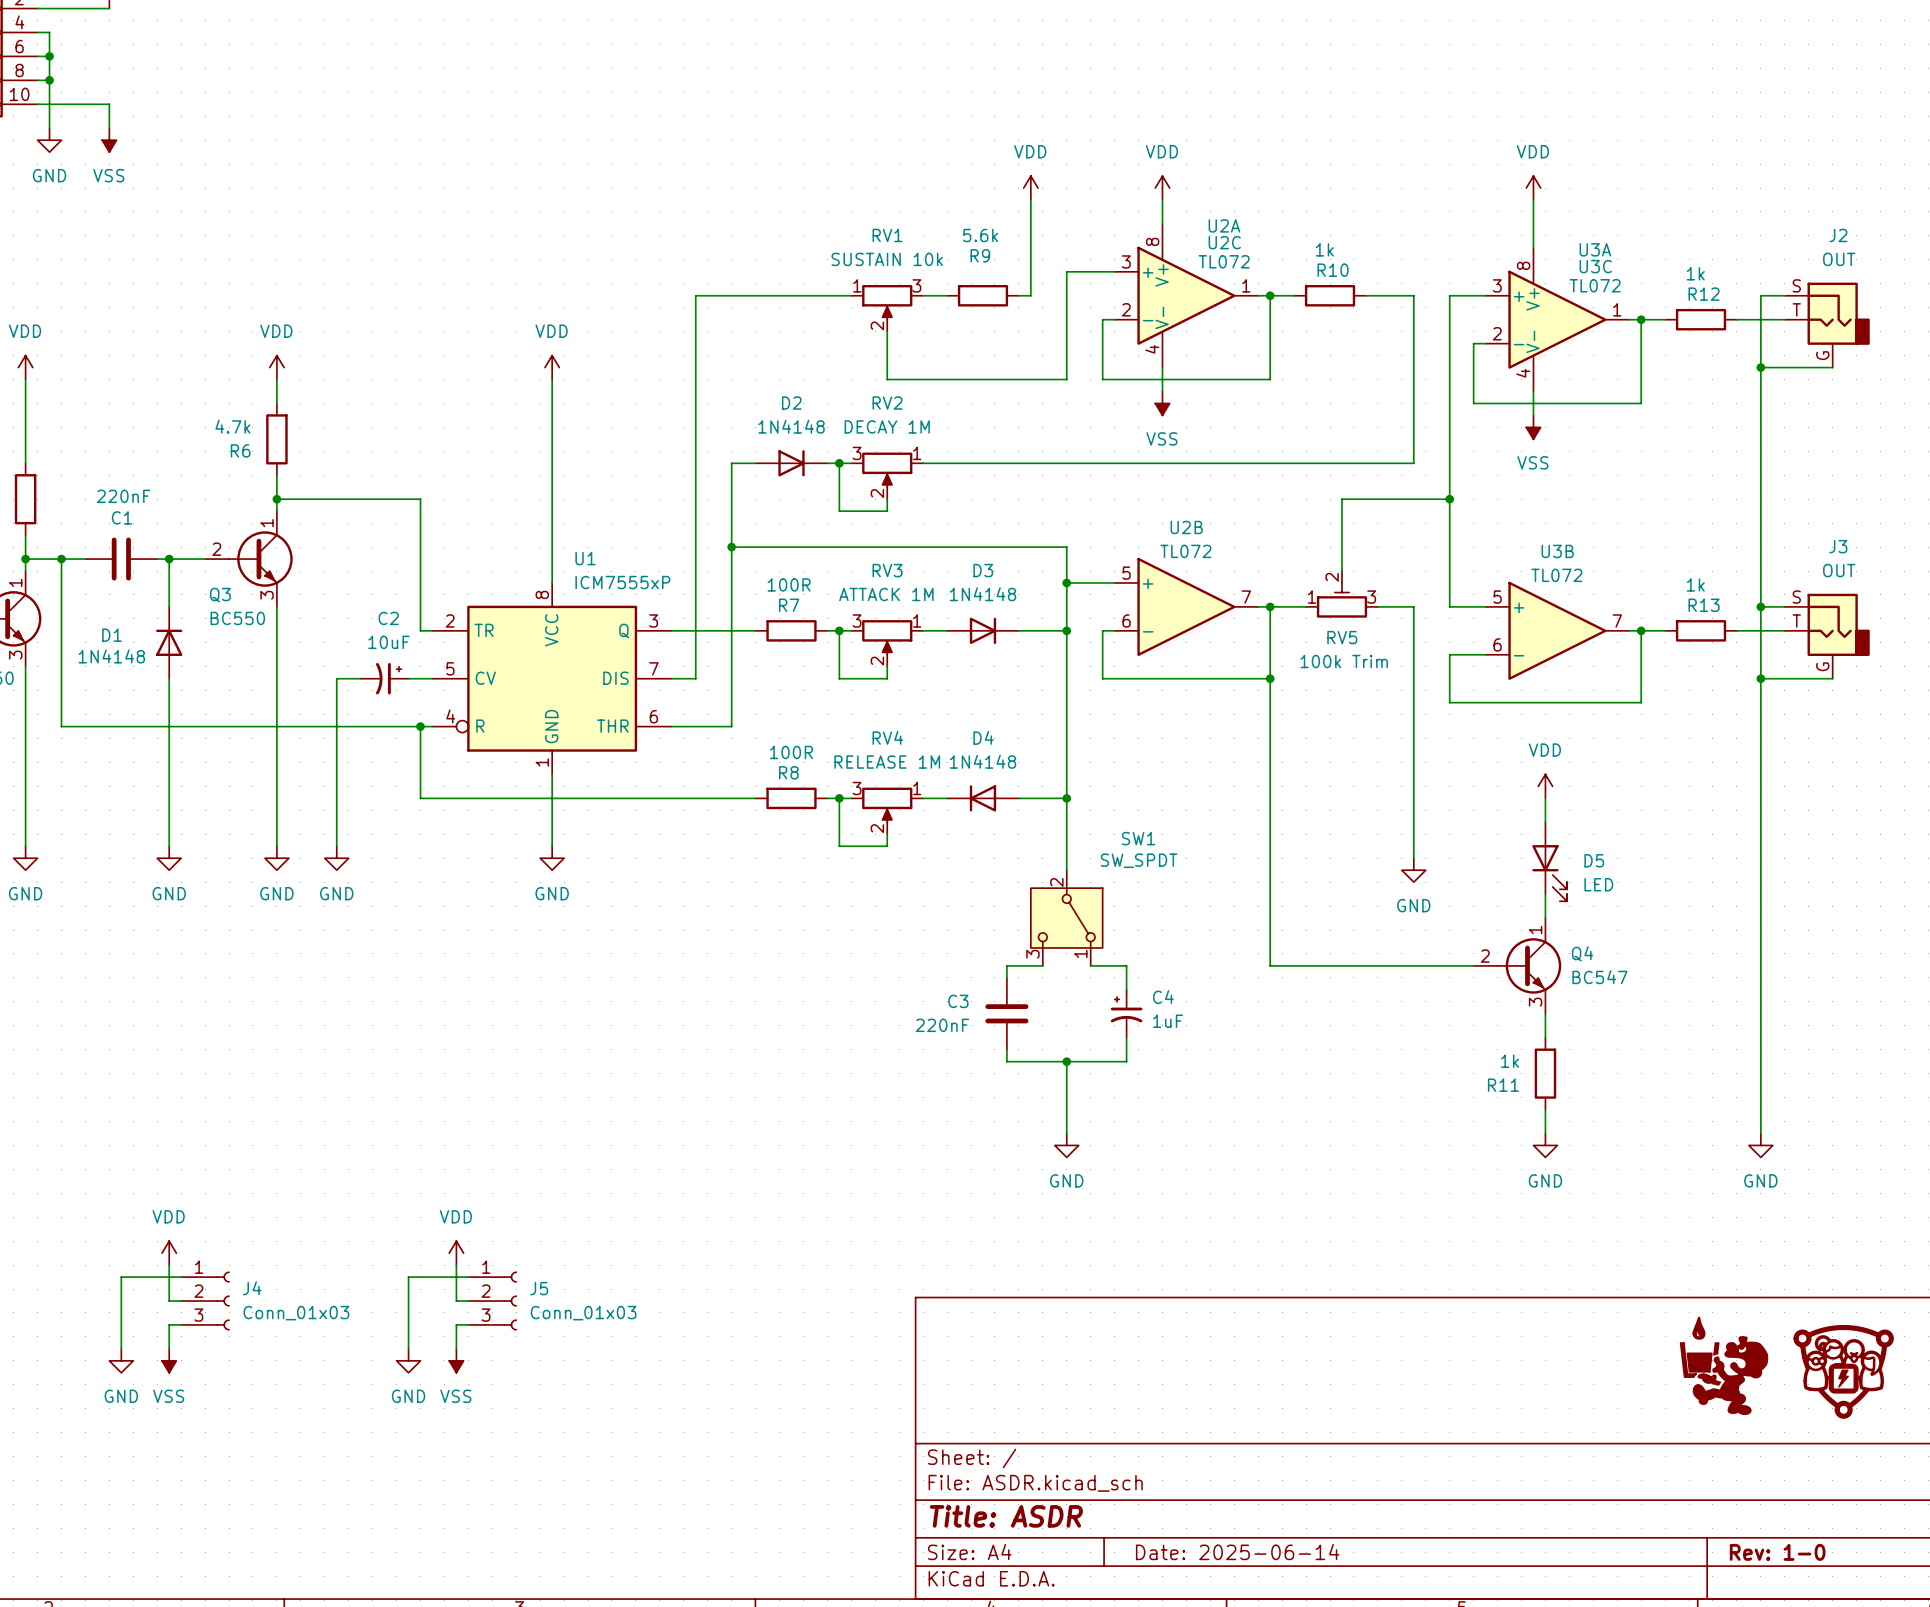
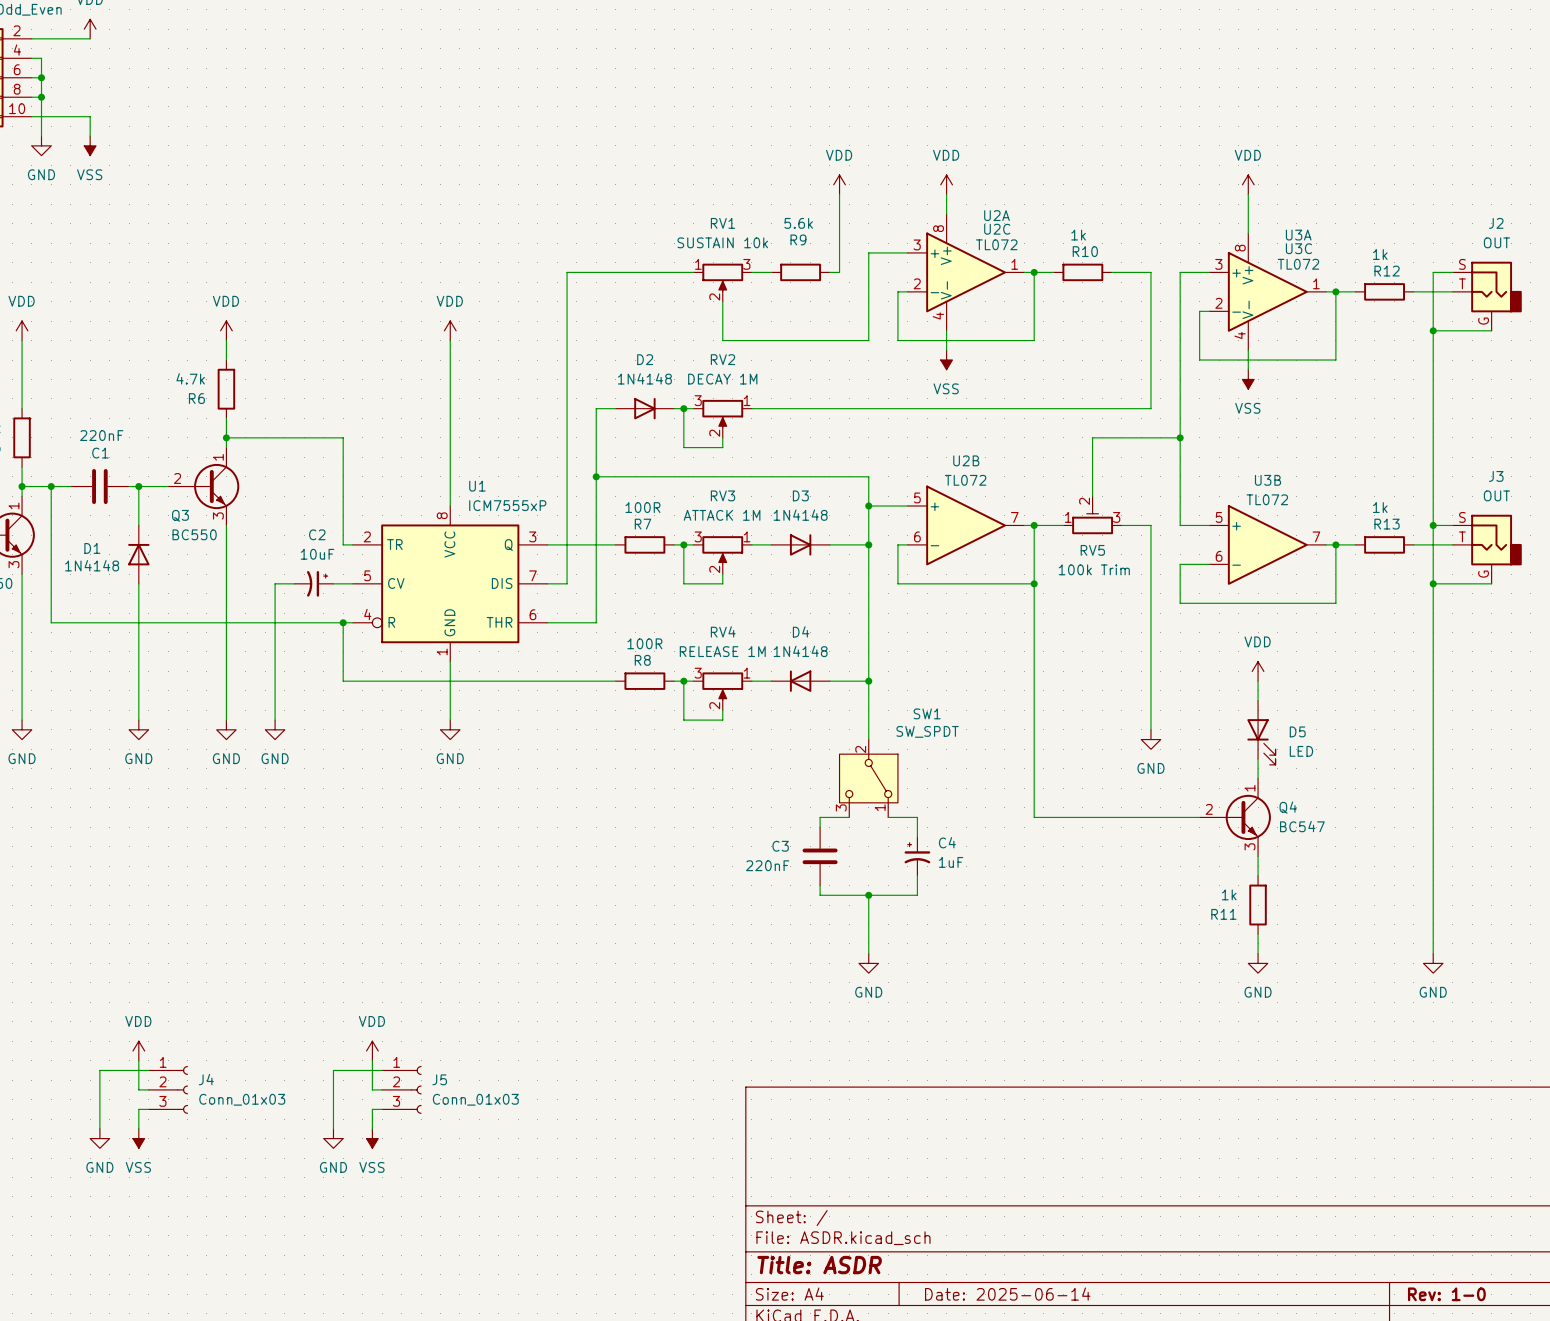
part: (1724, 1365) -> none
part: (1843, 1371) -> none

